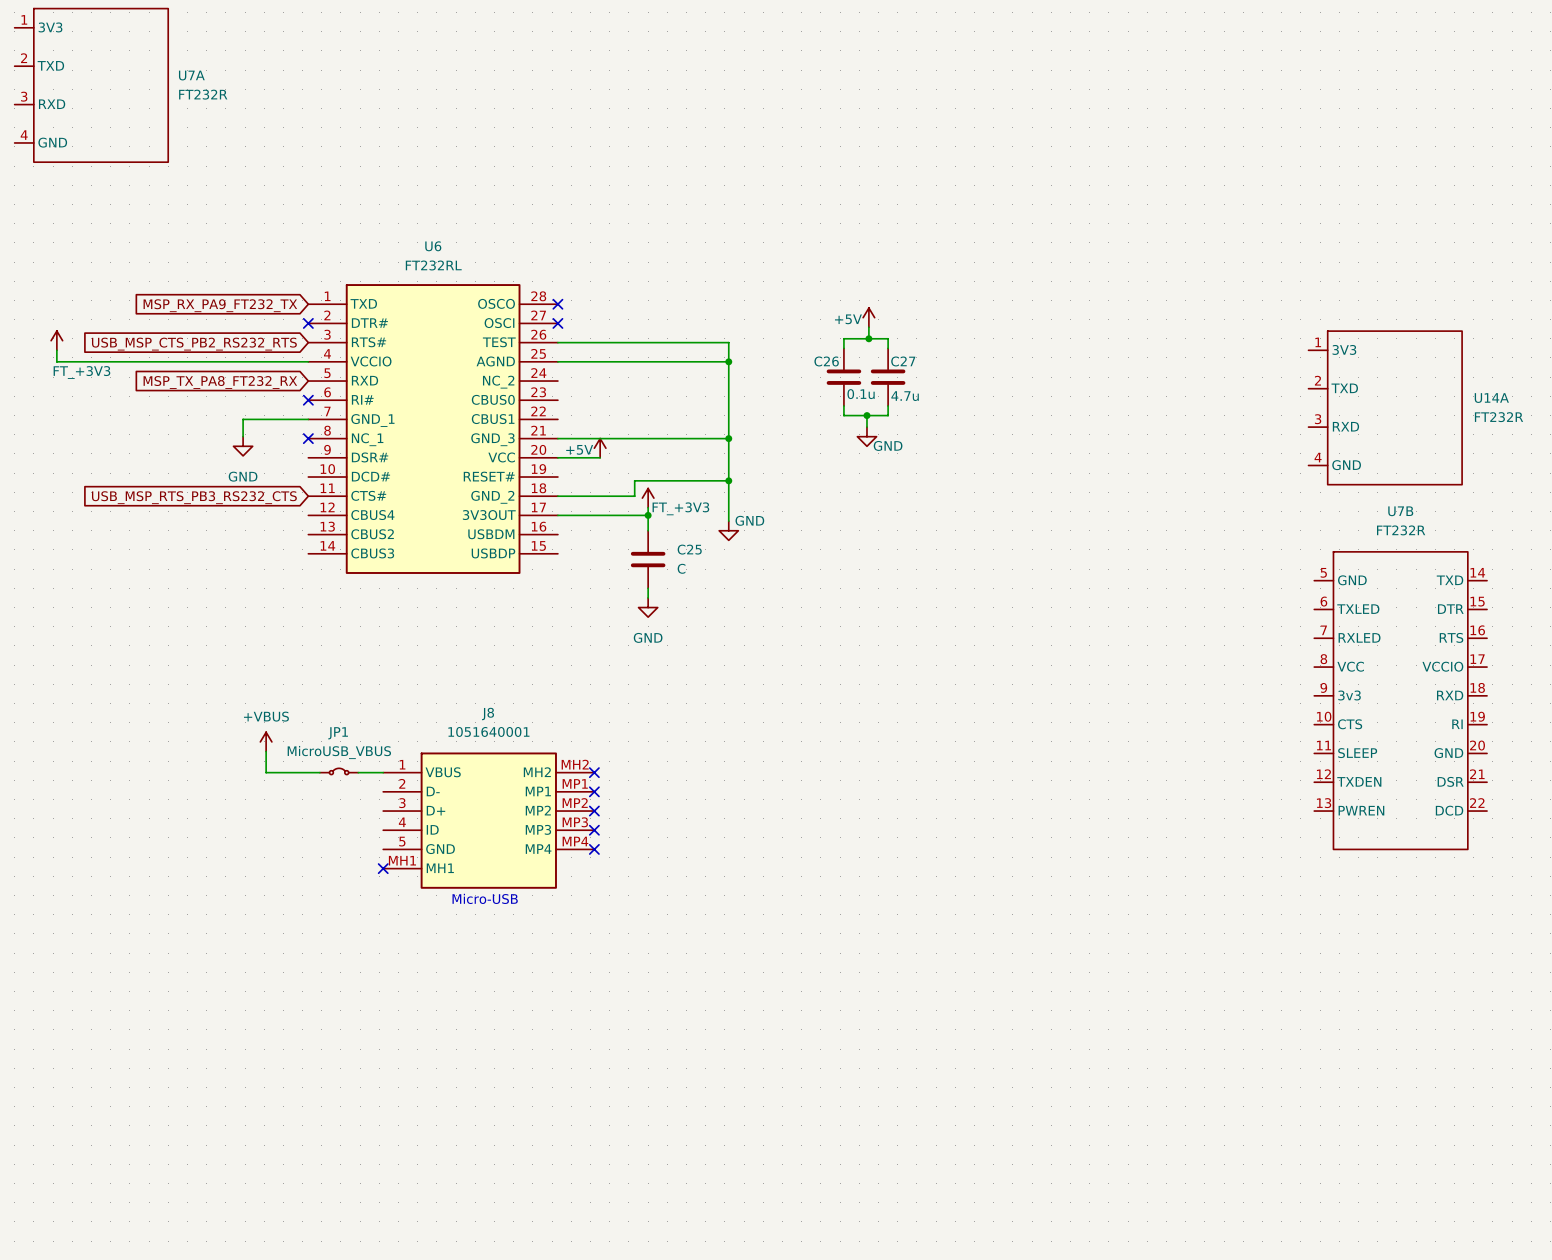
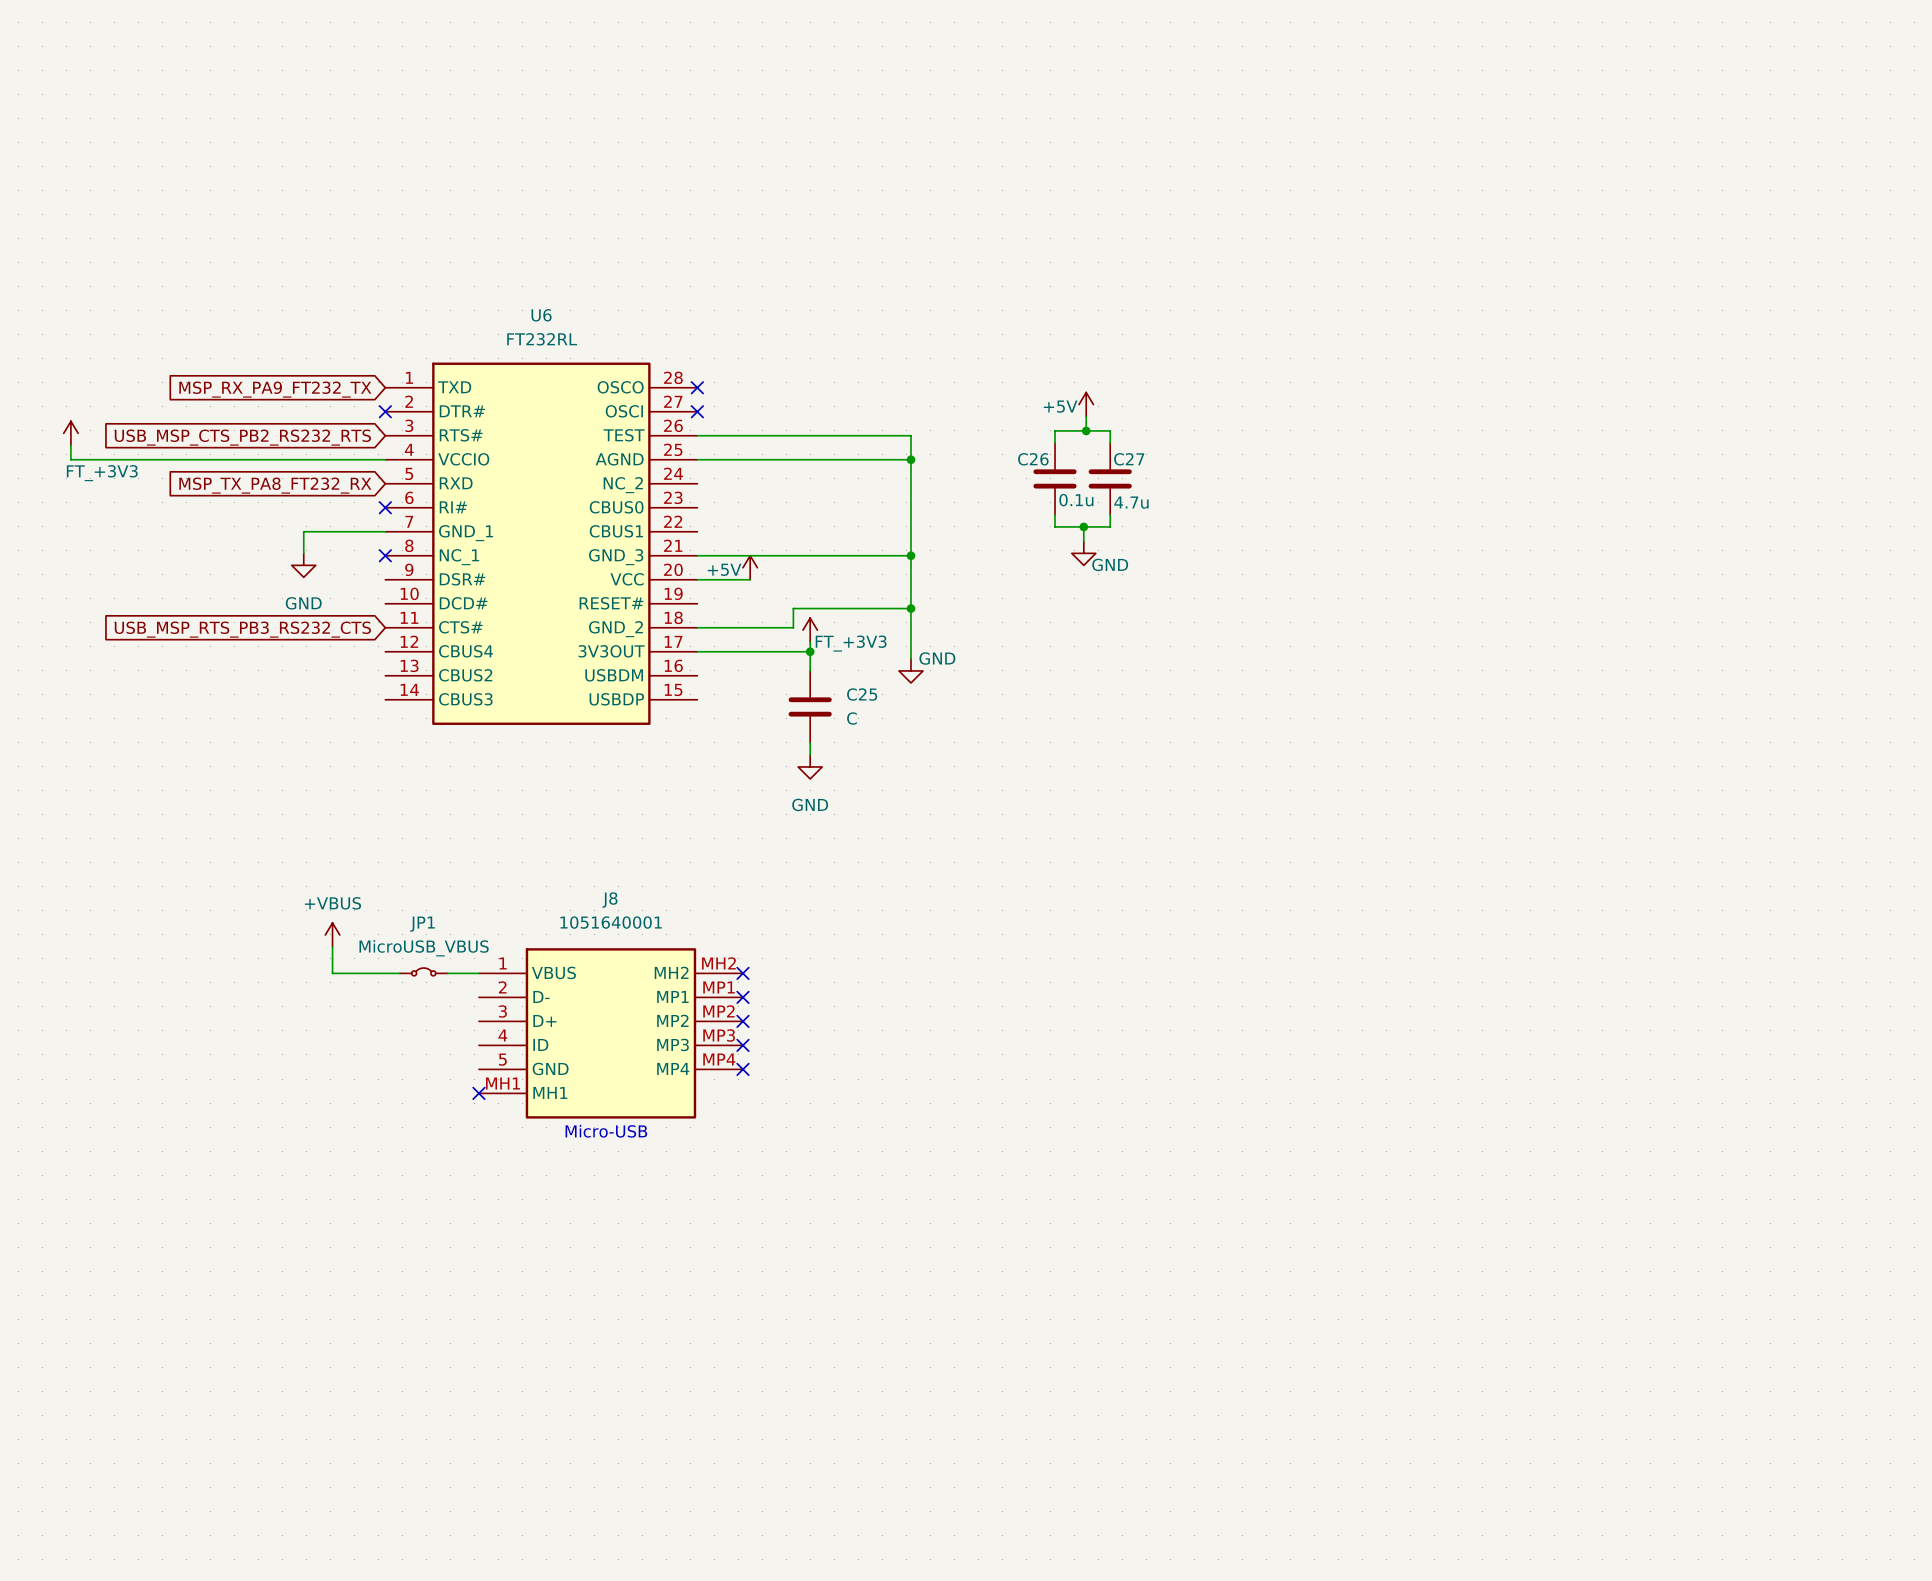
U7A: FT232R (91, 85) -> none
U14A: FT232R (1385, 407) -> none
U7B: FT232R (1400, 700) -> none

